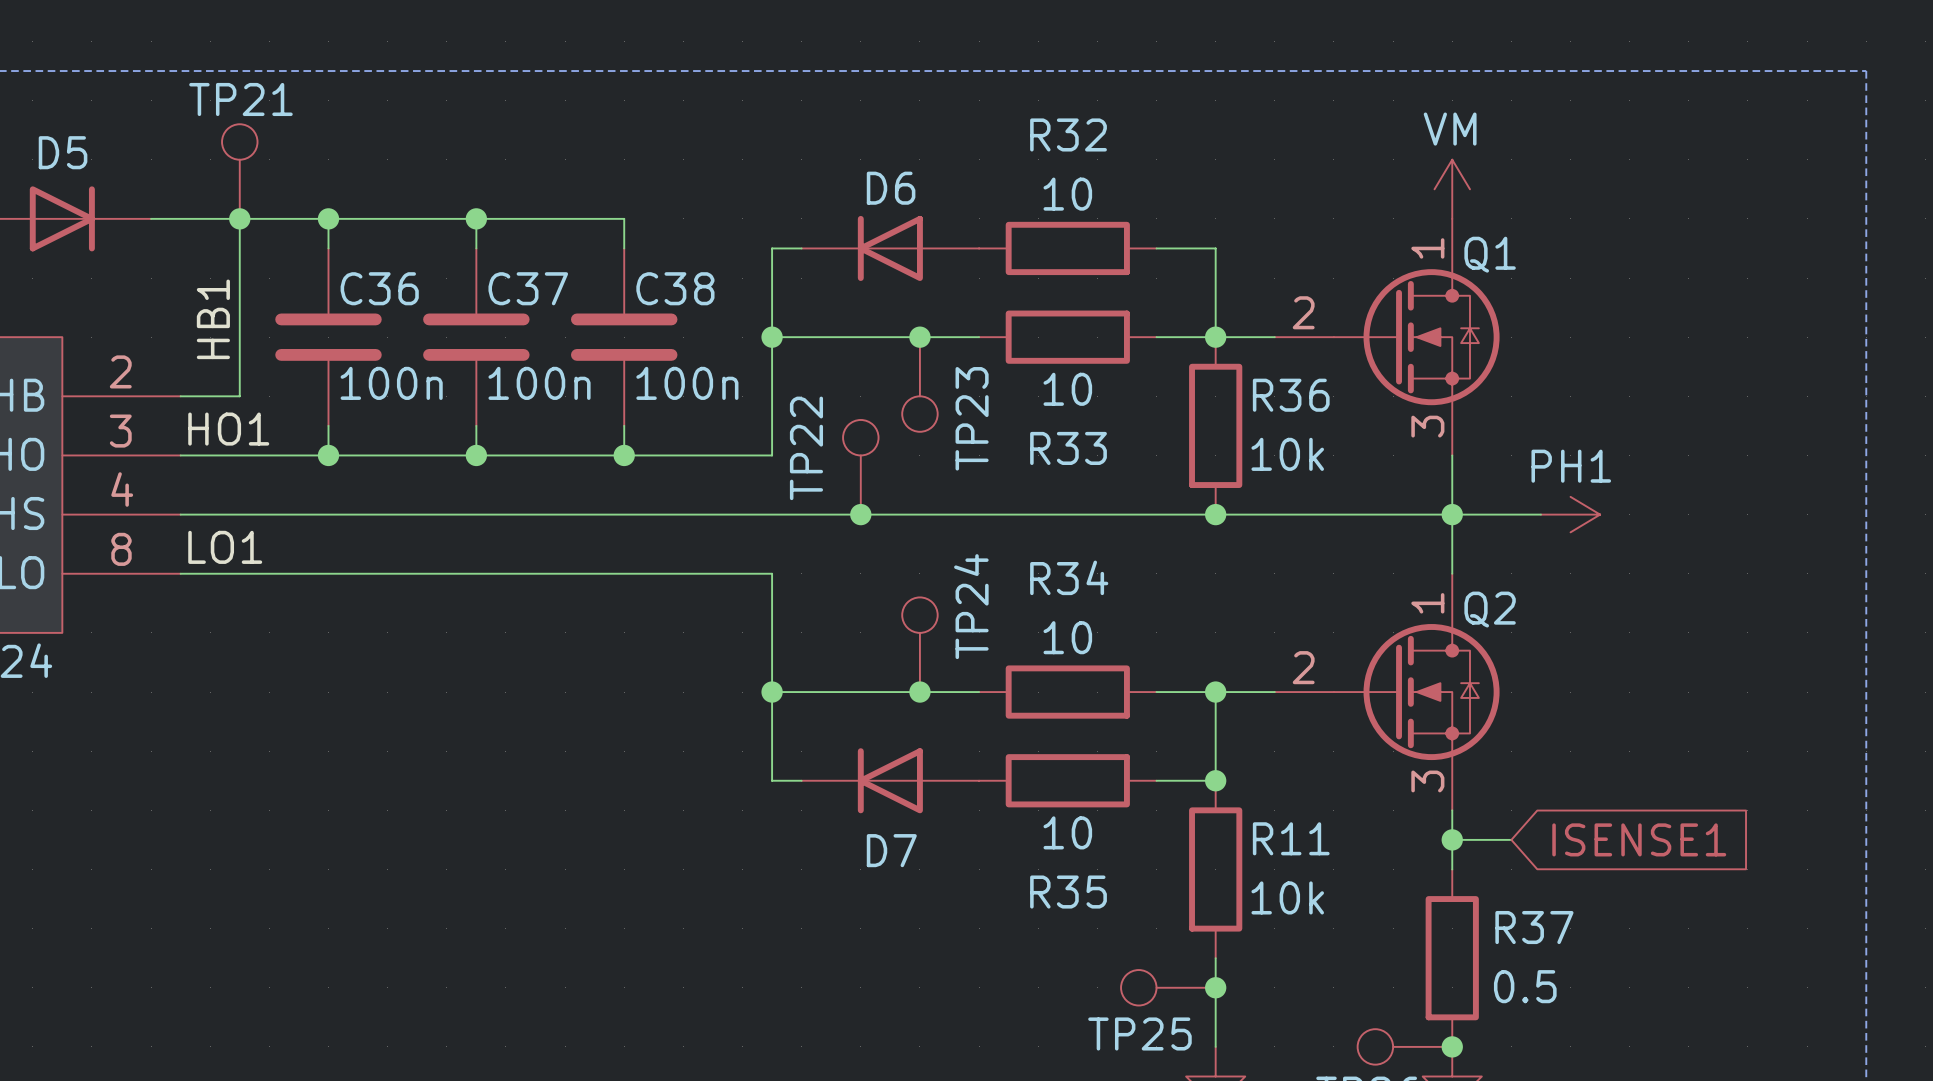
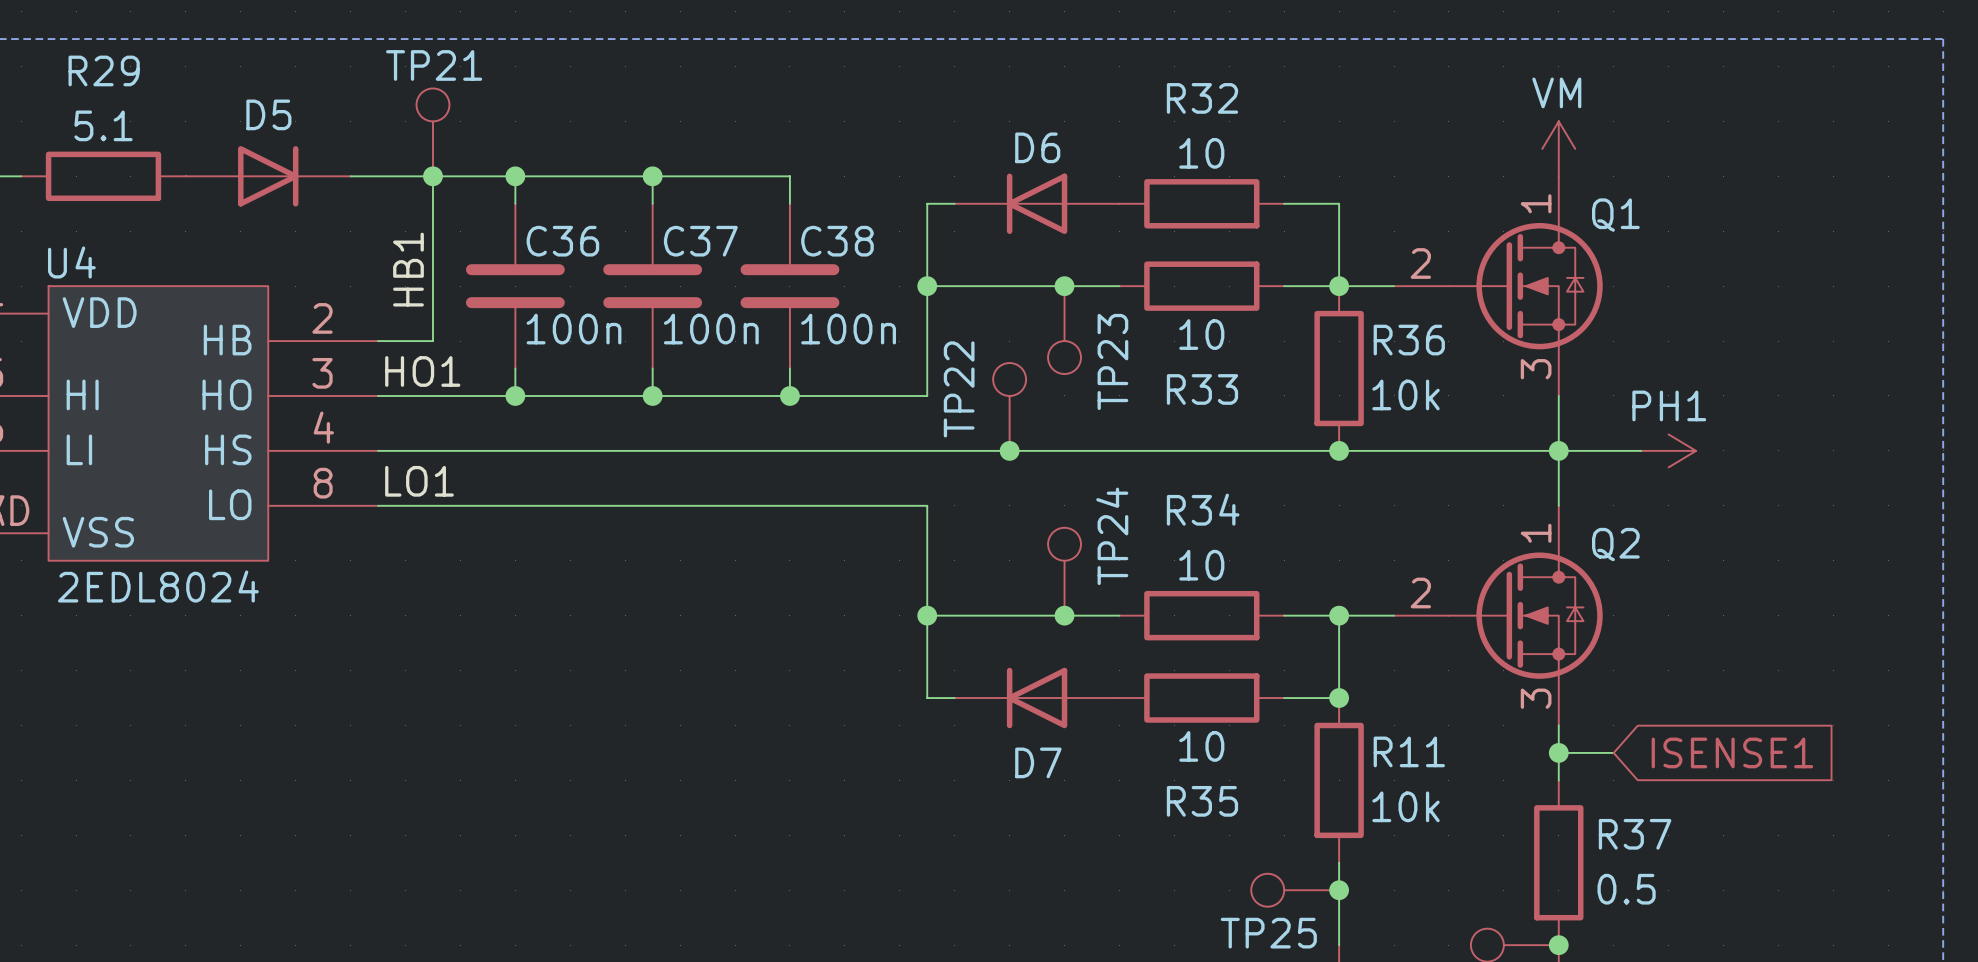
Q1 name position: Q1 (1490, 254) -> Q1 (1615, 215)
Q2 name position: Q2 (1490, 609) -> Q2 (1615, 544)

